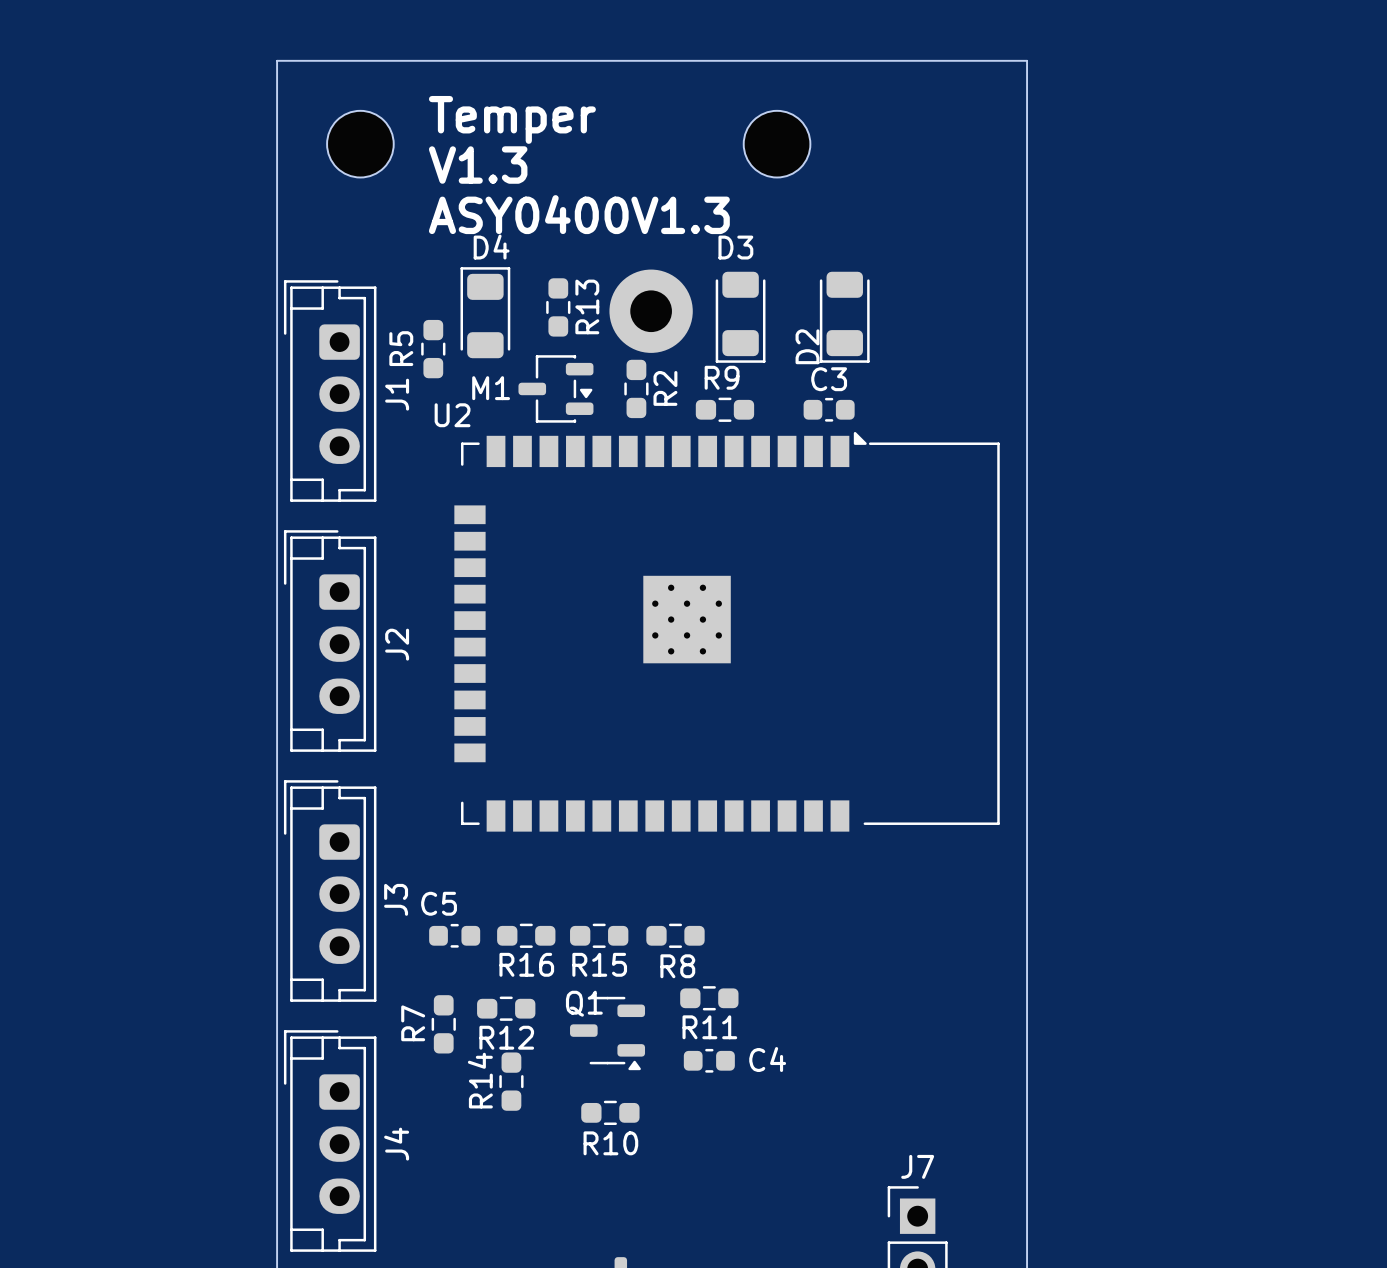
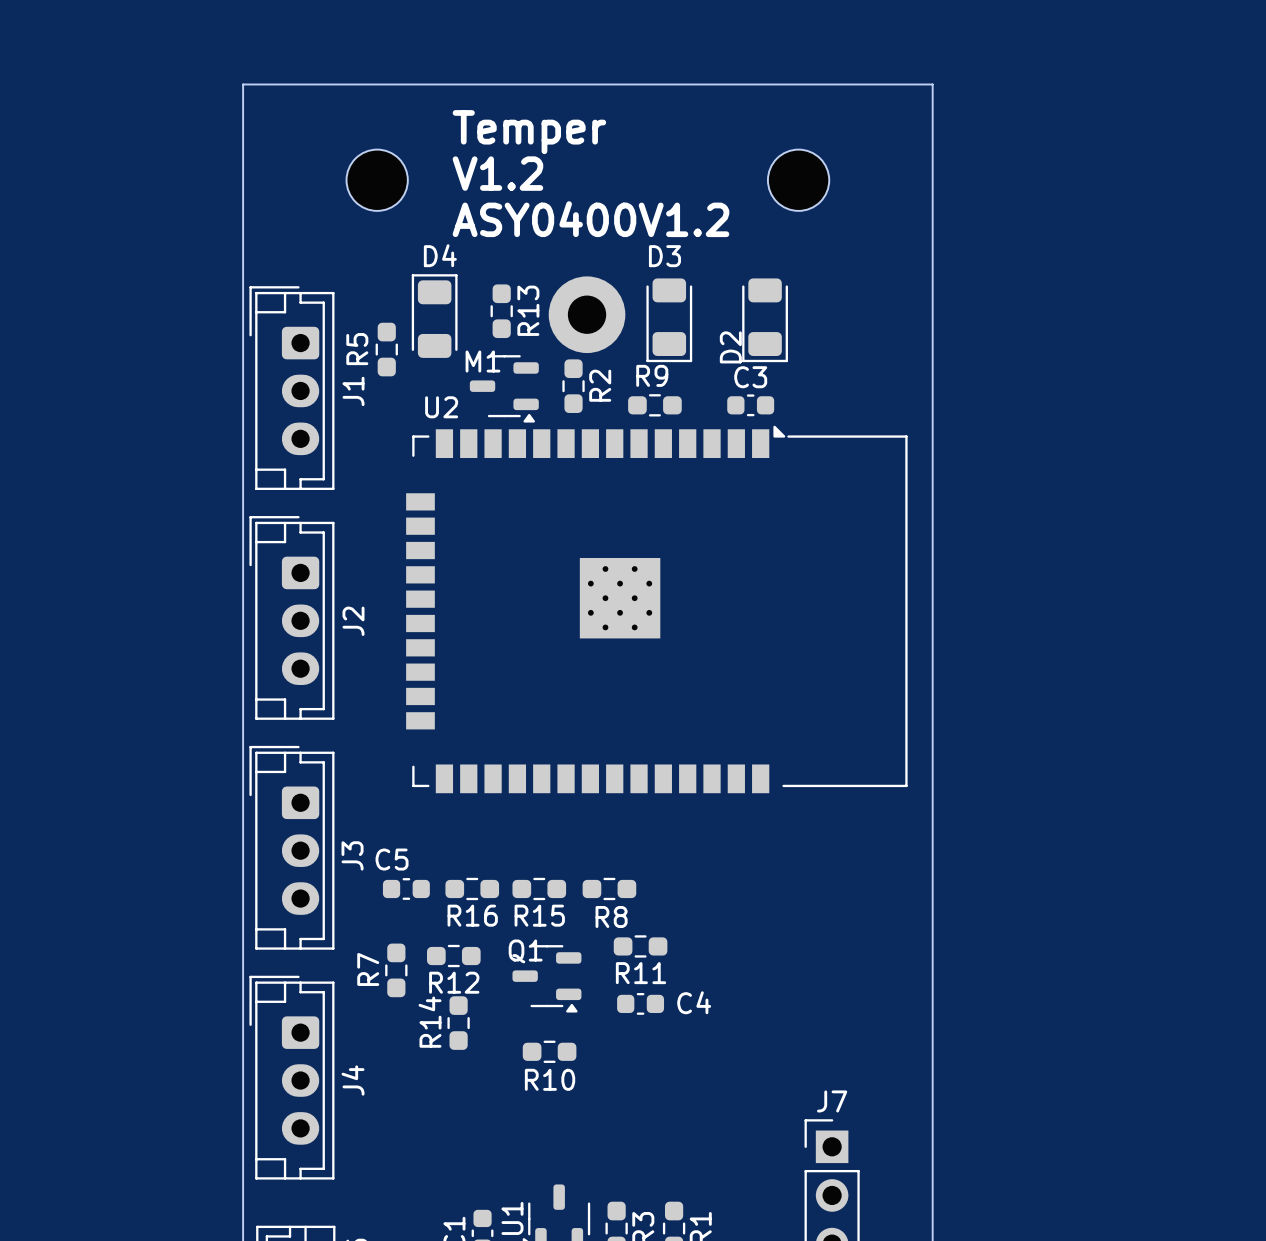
text position: Temper (512, 119) -> Temper (529, 132)
part position: (360, 144) -> (377, 180)
part position: (777, 144) -> (798, 180)
text: V1.3 (478, 165) -> V1.2 (497, 173)
text: ASY0400V1.3 (579, 214) -> ASY0400V1.2 (590, 219)
M1 footprint: [518, 355, 594, 423] -> [469, 355, 539, 423]
M1 name position: M1 (491, 388) -> M1 (482, 361)
U2 name position: U2 (452, 415) -> U2 (441, 407)

